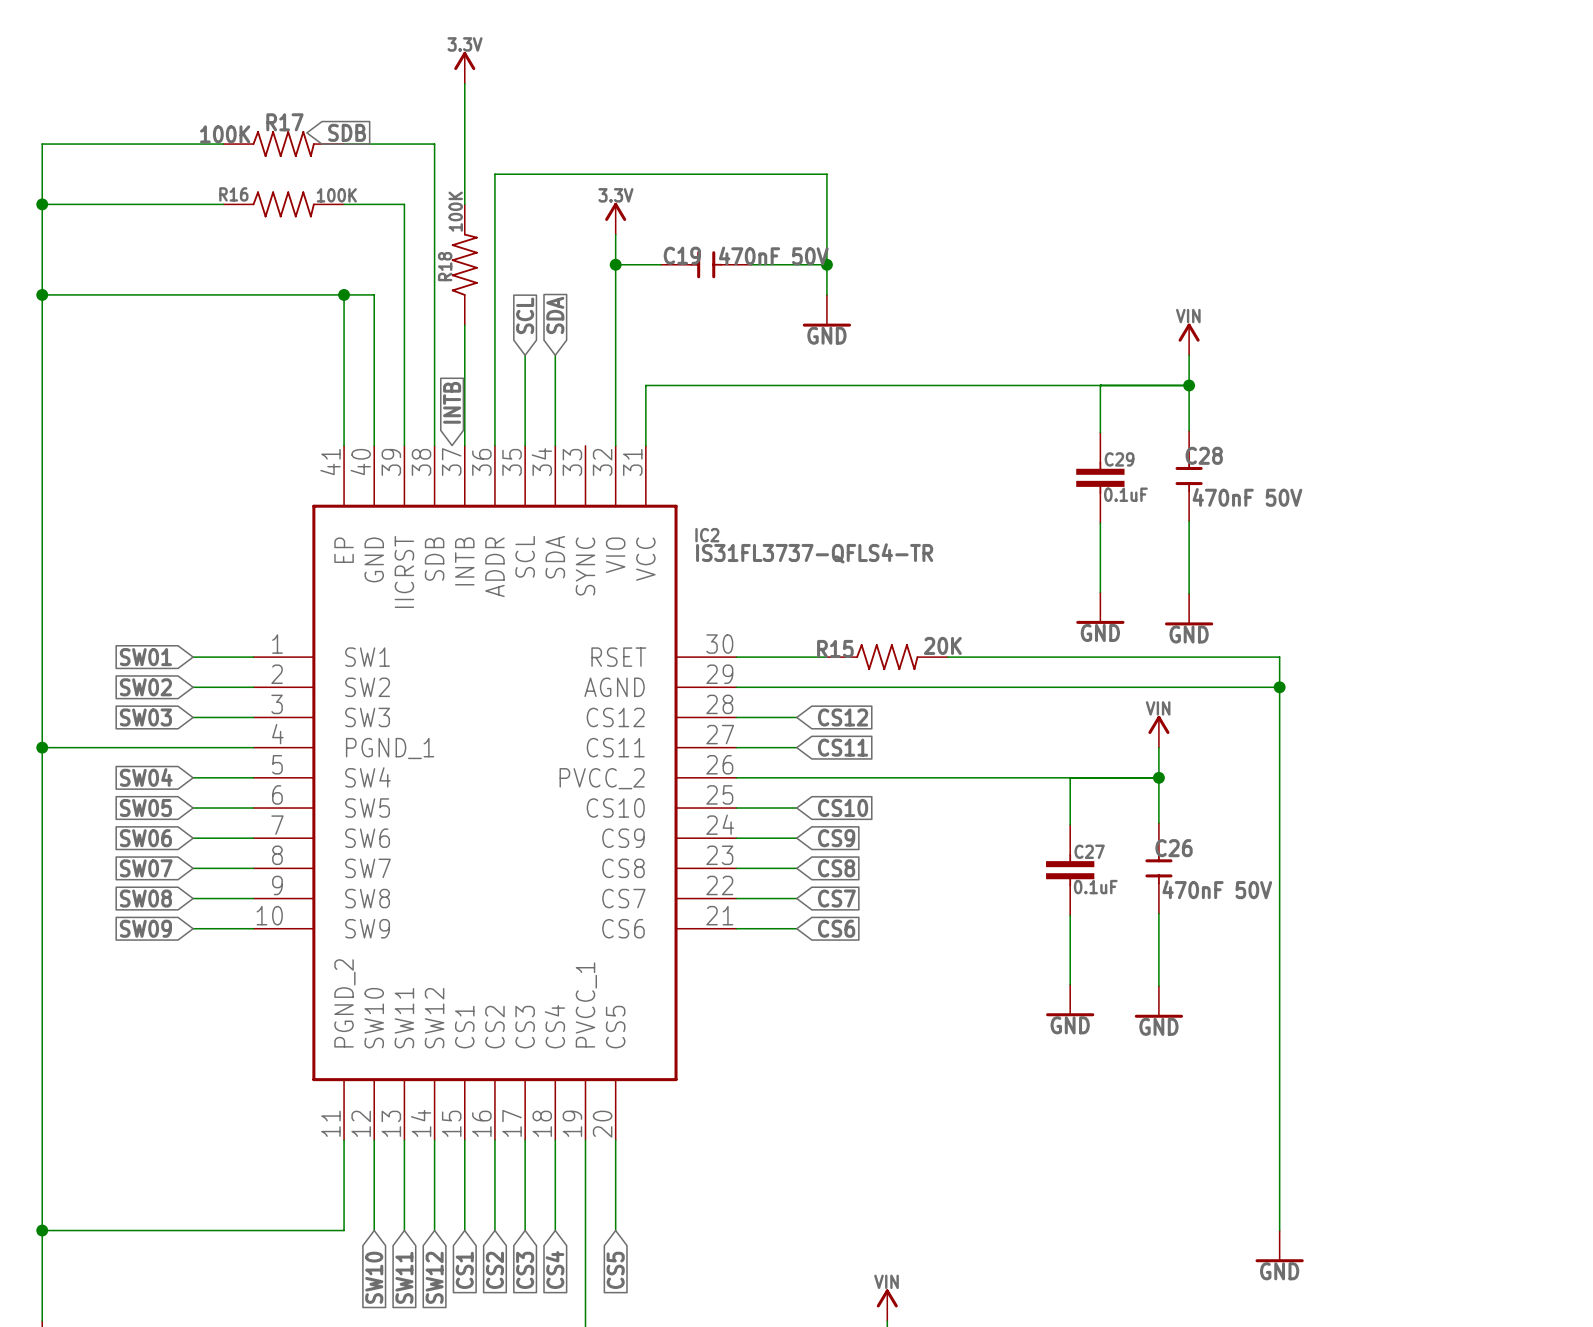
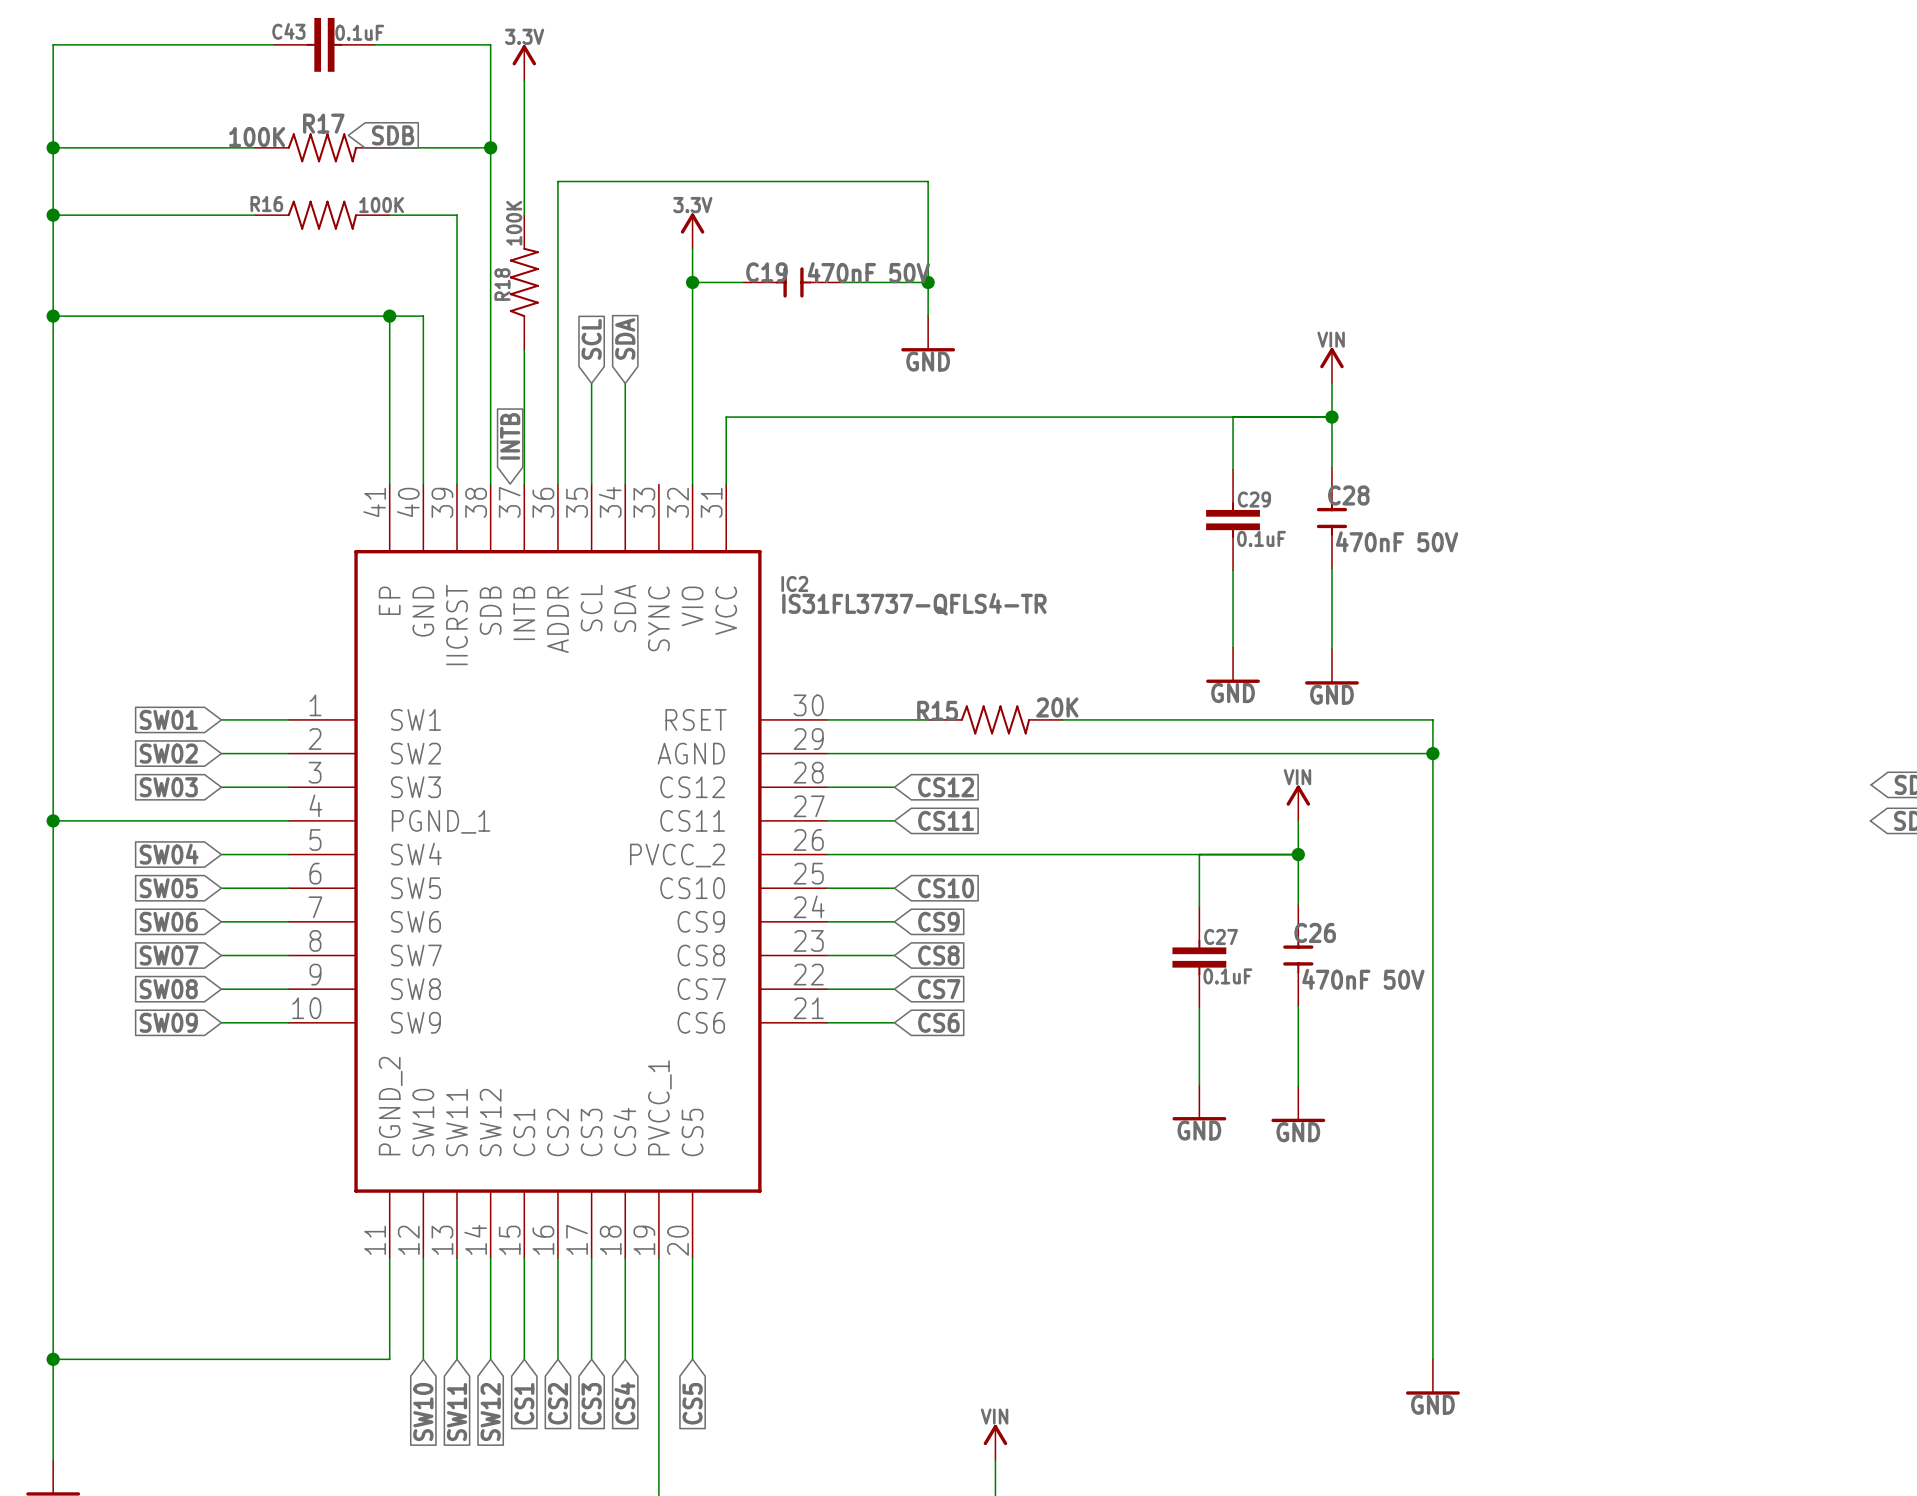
wire: none -> (273, 44) (53, 44) (53, 147)
C43: none -> 0.1uF (324, 44)
wire: none -> (374, 44) (490, 44) (490, 147)
junction: none -> (53, 147)
junction: none -> (490, 147)

